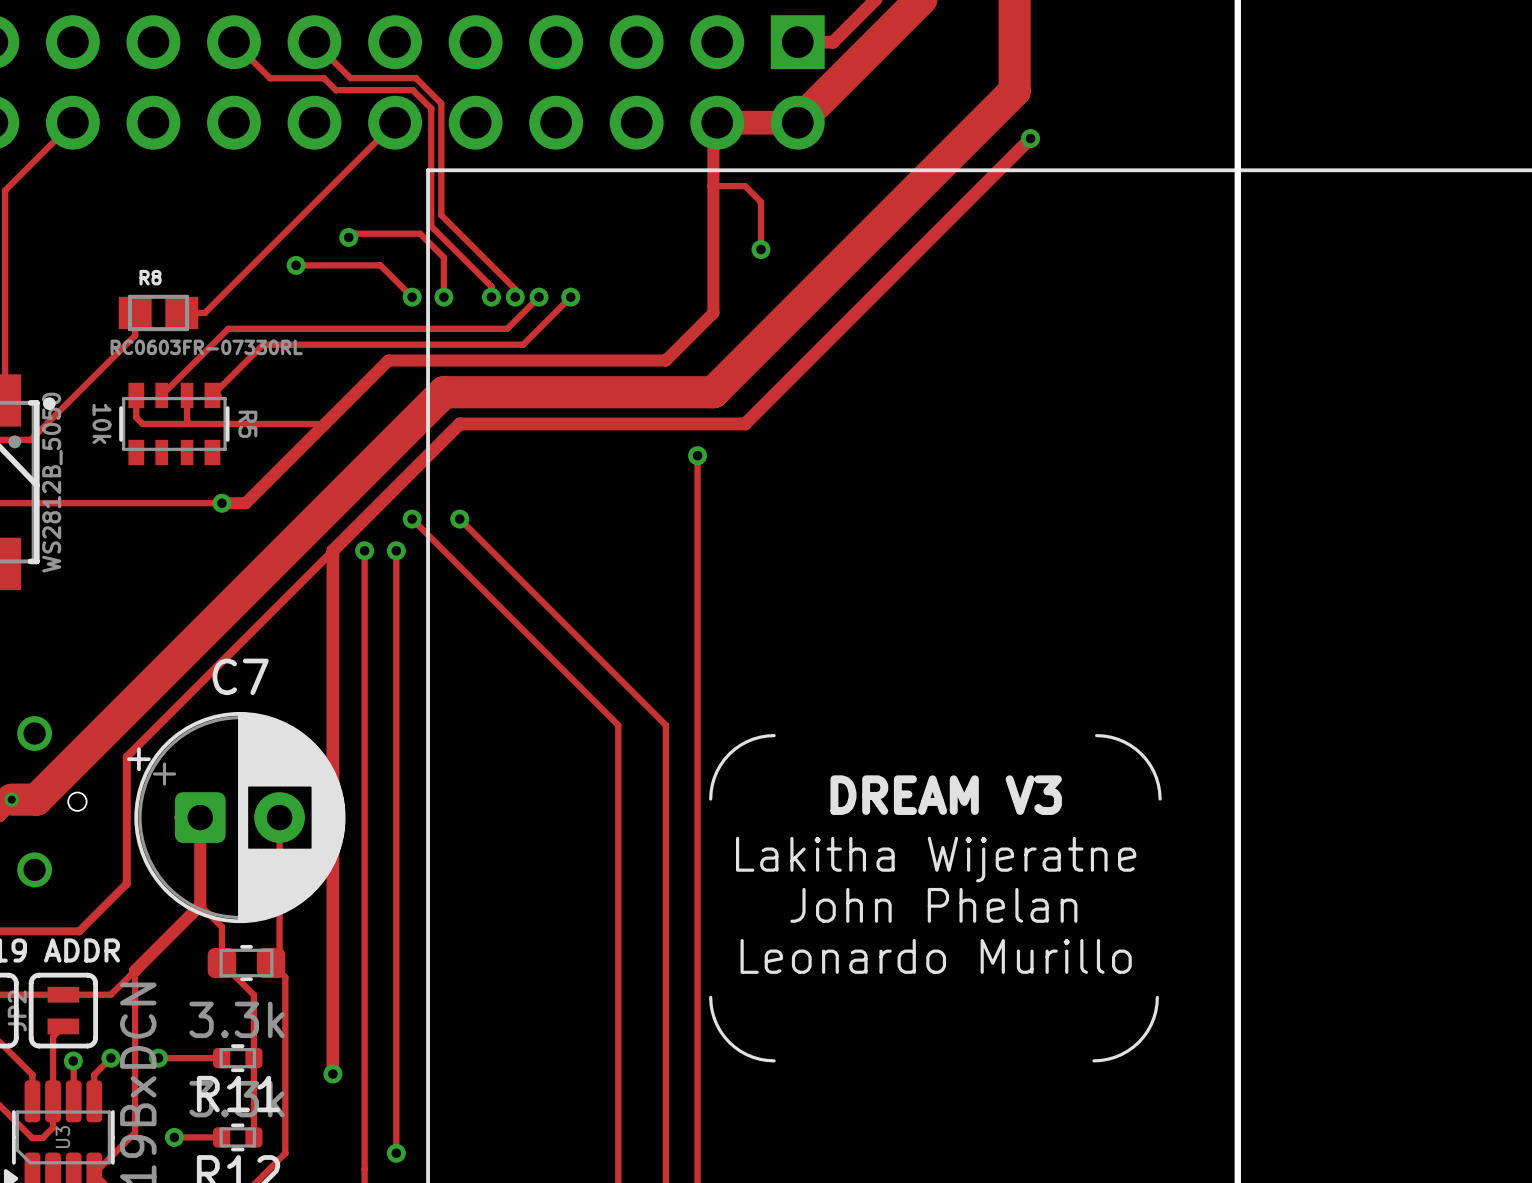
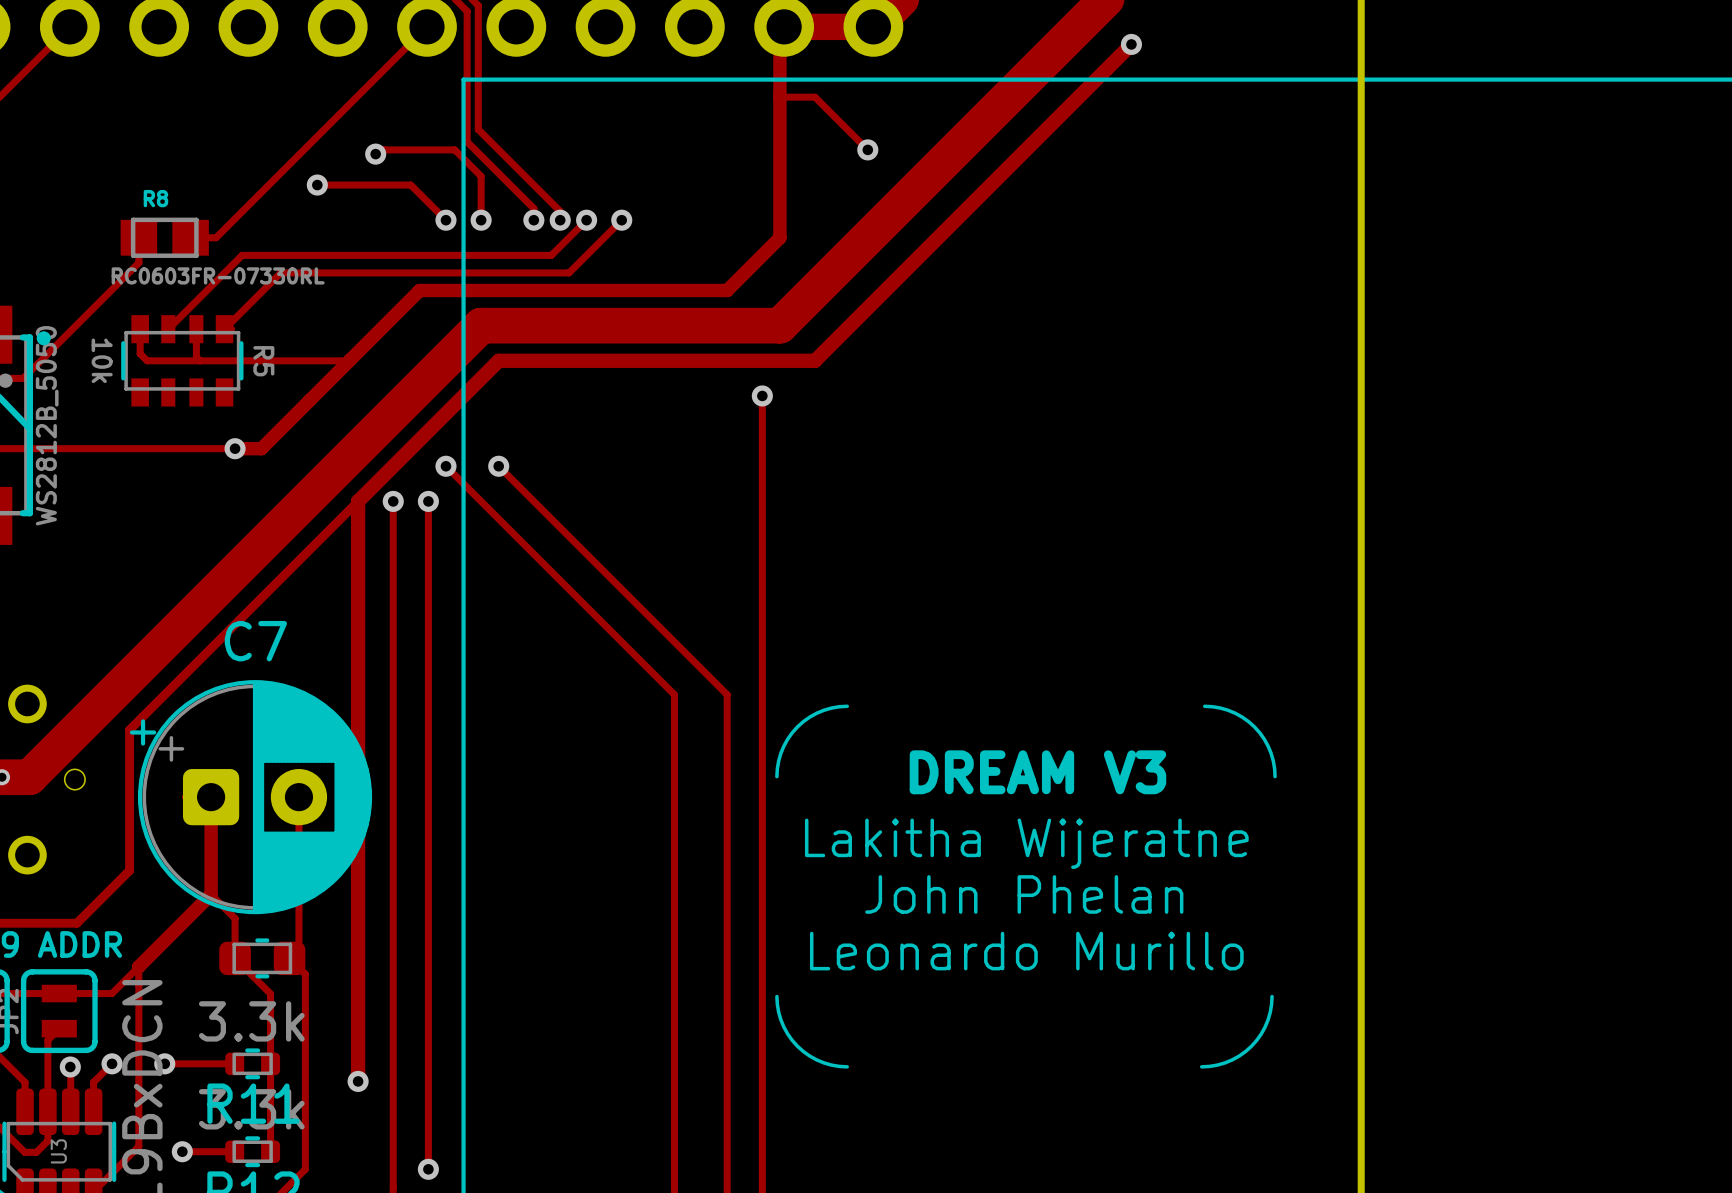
track: (760, 201) (760, 249) -> (832, 114) (867, 149)
via position: (760, 249) -> (867, 149)

